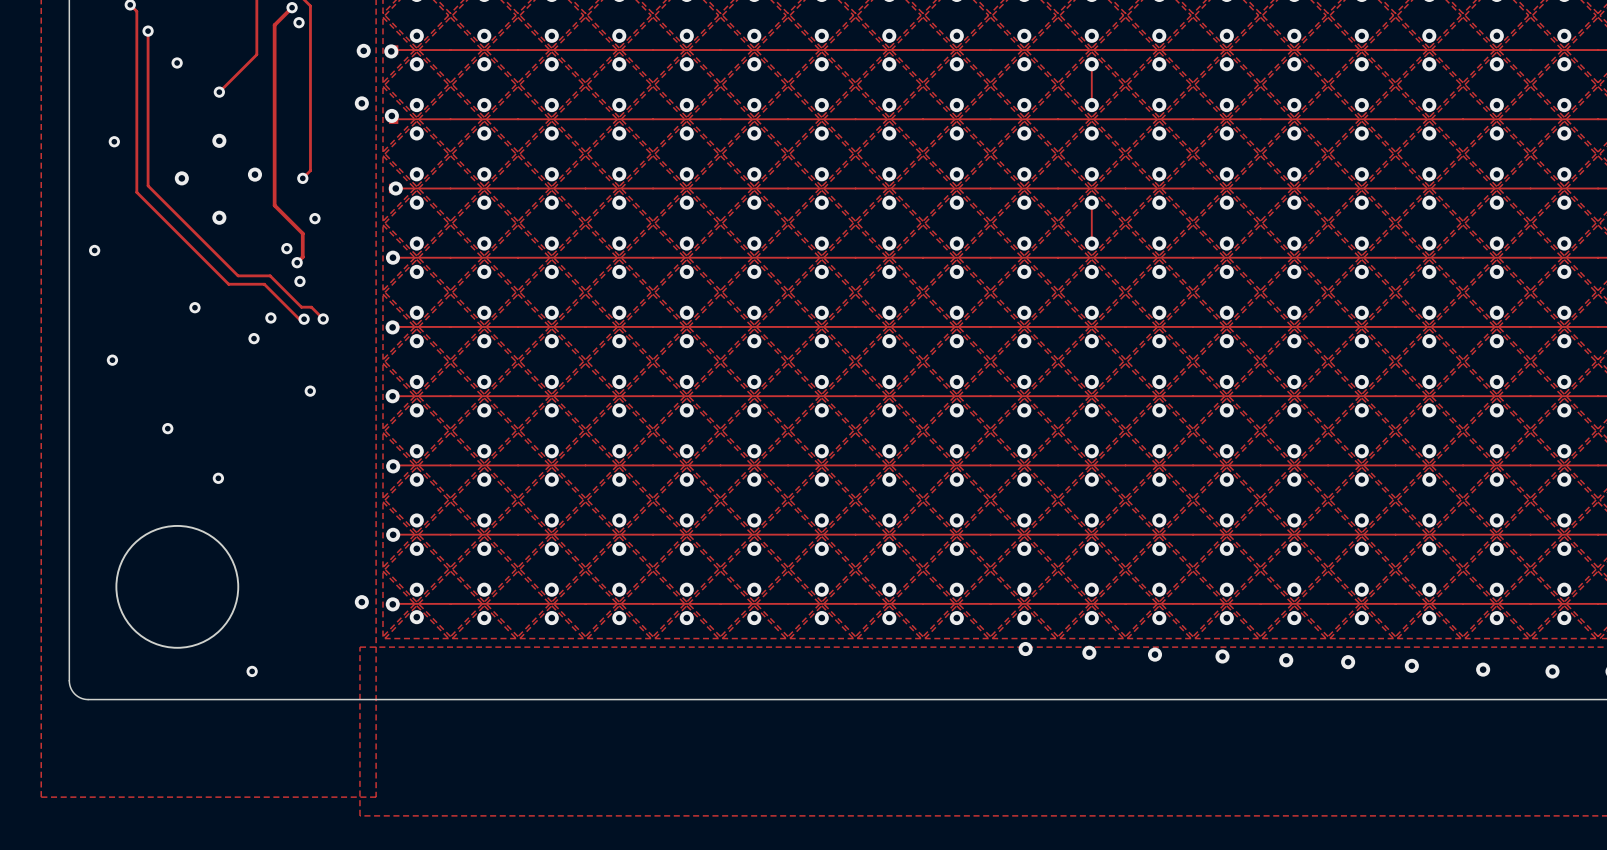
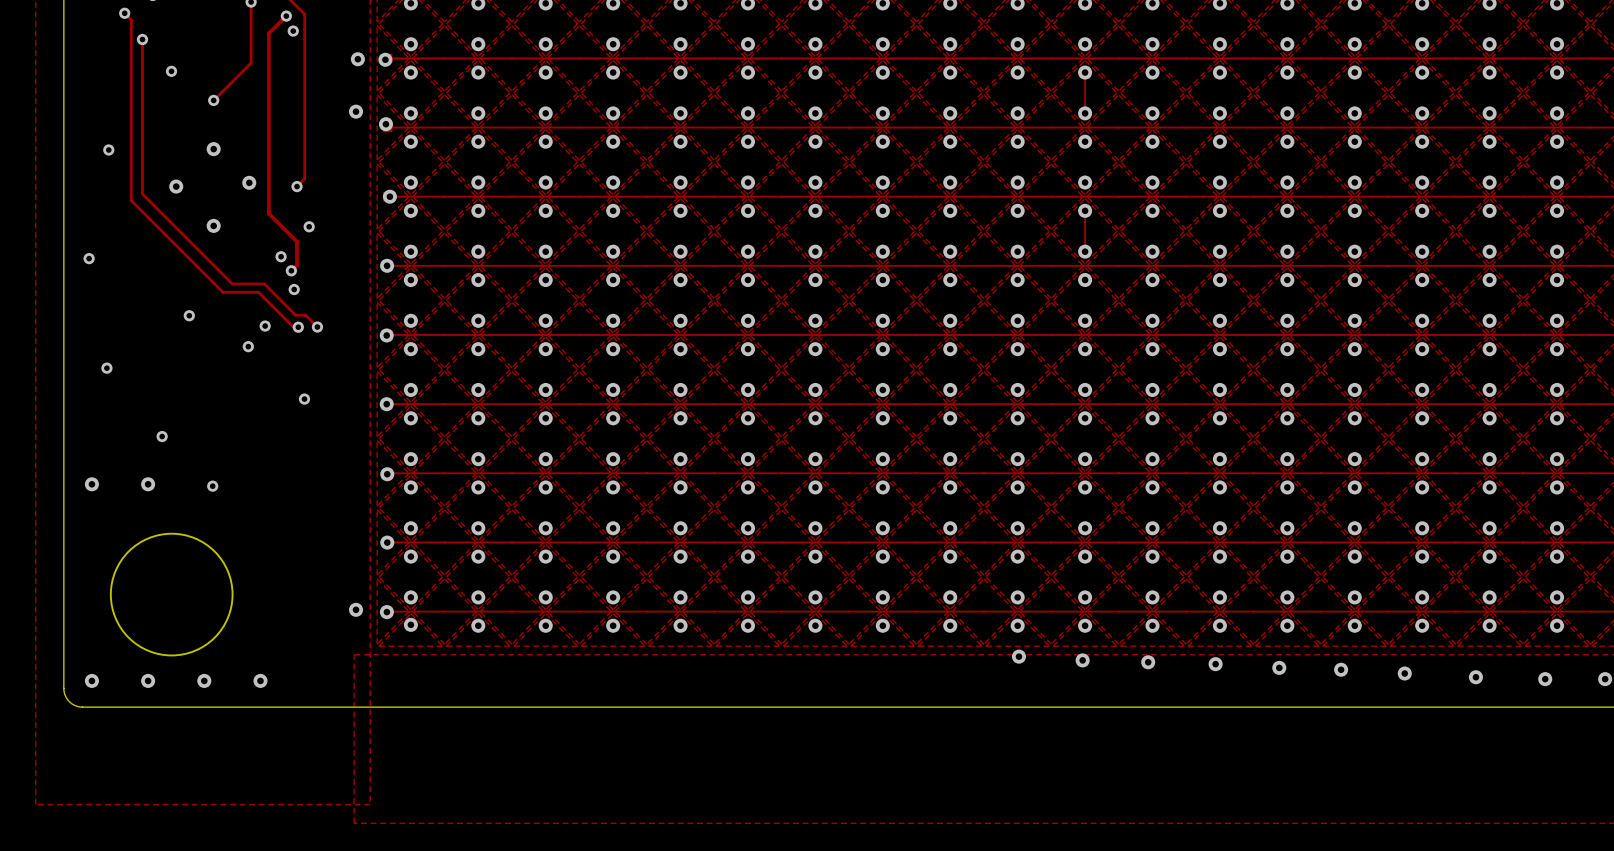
via: none -> (91, 484)
via: none -> (148, 484)
via: (252, 671) -> none
via: none -> (91, 680)
via: none -> (148, 680)
via: none -> (204, 680)
via: none -> (260, 680)

